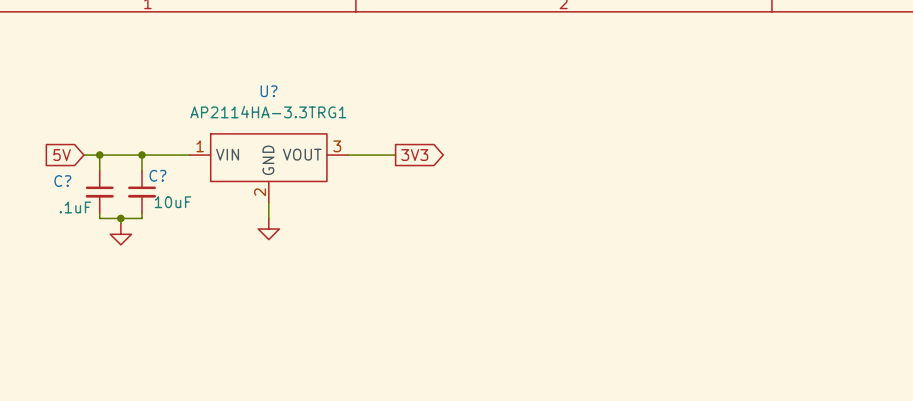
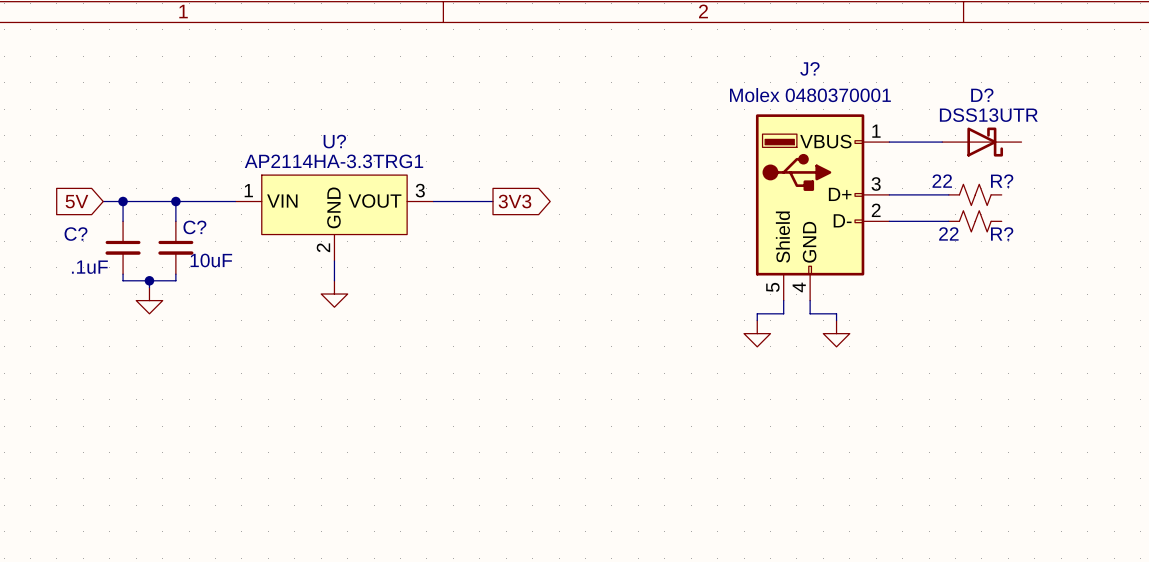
wire: none -> (889, 142) (942, 142)
D?: none -> DSS13UTR (981, 142)
U? symbol: [189, 133, 349, 203] -> [235, 175, 434, 261]
wire: none -> (889, 194) (948, 194)
R?: none -> 22 (975, 194)
J?: none -> Molex 0480370001 (822, 207)
wire: none -> (889, 221) (948, 221)
R?: none -> 22 (975, 221)
wire: none -> (783, 300) (783, 313) (757, 313) (757, 320)
wire: none -> (810, 300) (810, 313) (836, 313) (836, 320)
power symbol: none -> (757, 333)
power symbol: none -> (836, 333)

